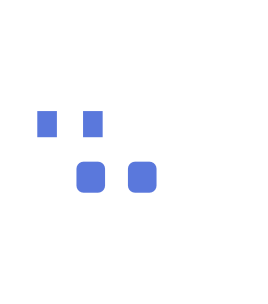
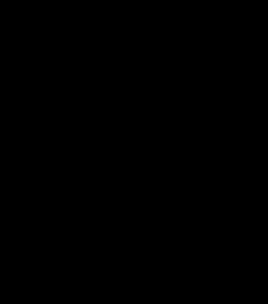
part: (69, 124) -> none
part: (116, 177) -> none

